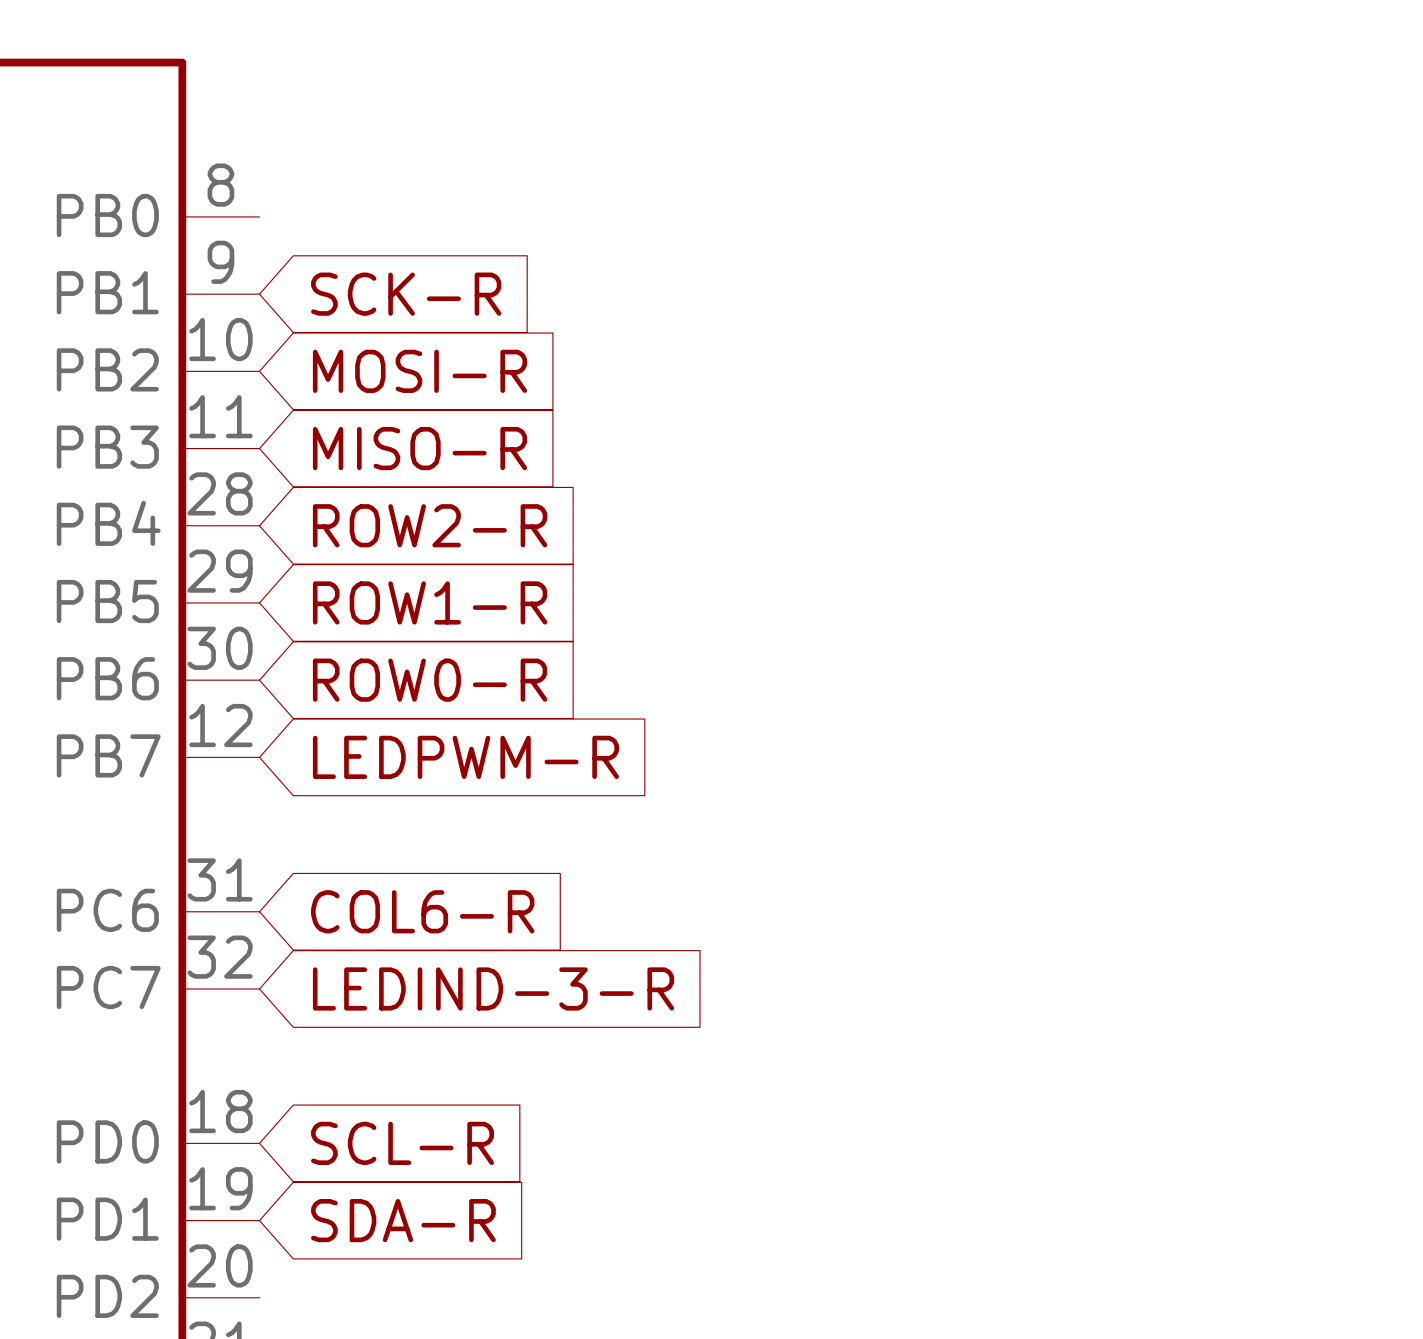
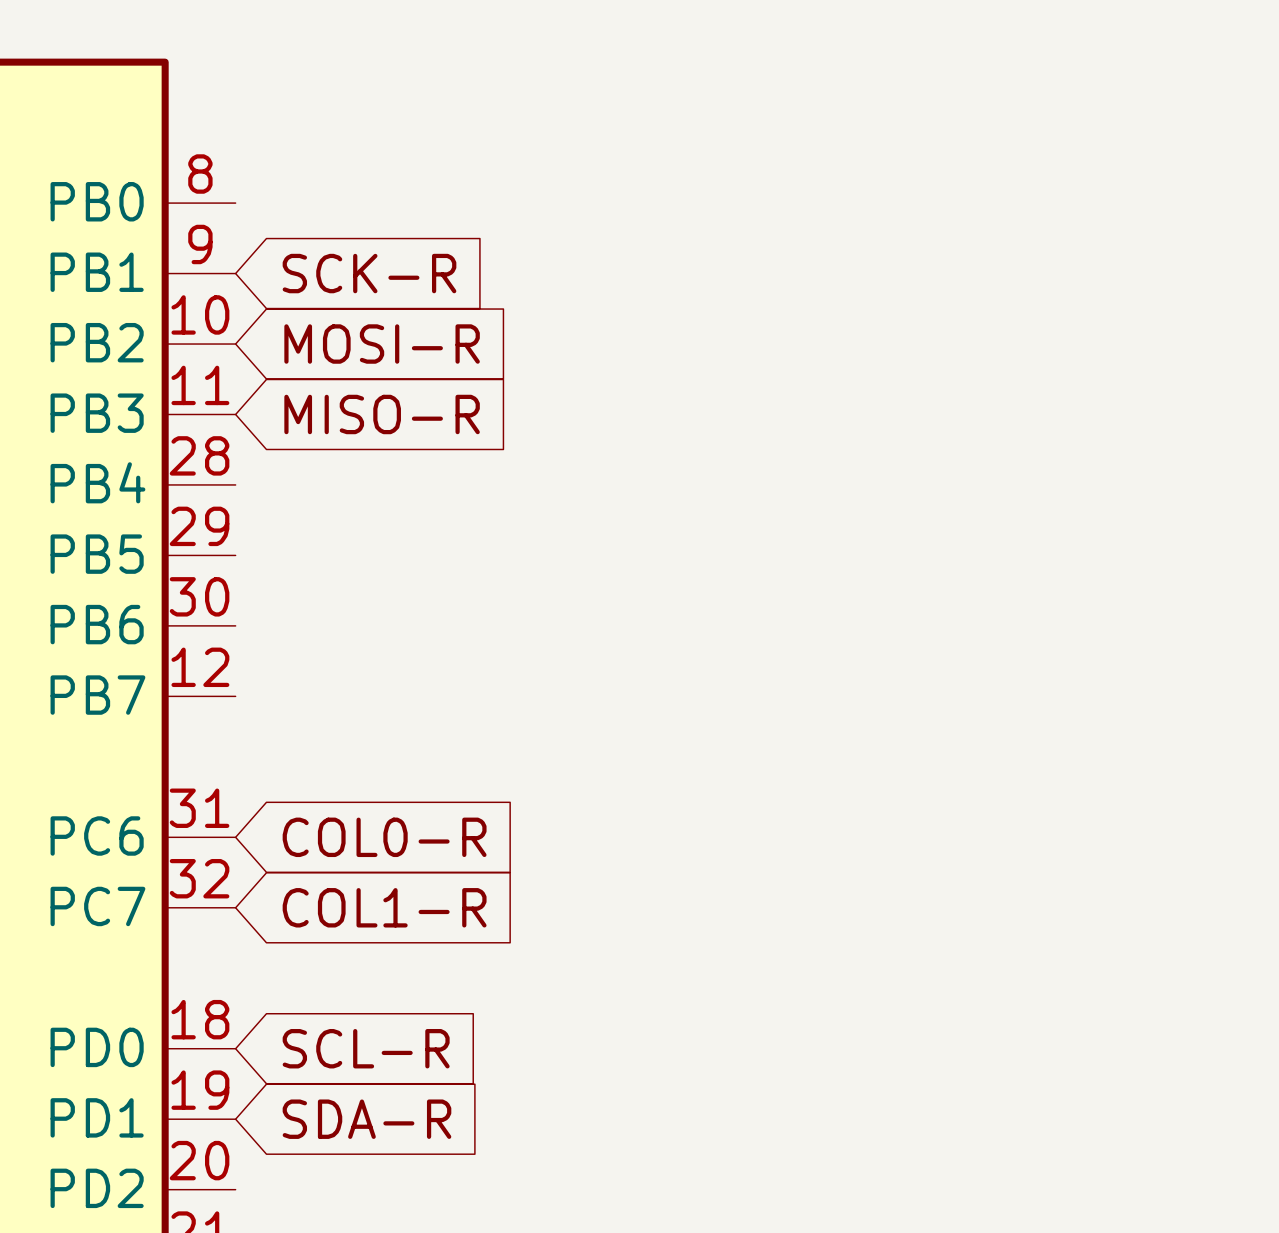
global label: ROW2-R (430, 525) -> none
global label: ROW1-R (430, 602) -> none
global label: ROW0-R (430, 680) -> none
global label: LEDPWM-R (465, 757) -> none
global label: COL6-R (422, 911) -> COL0-R (384, 837)
global label: LEDIND-3-R (493, 988) -> COL1-R (384, 907)

